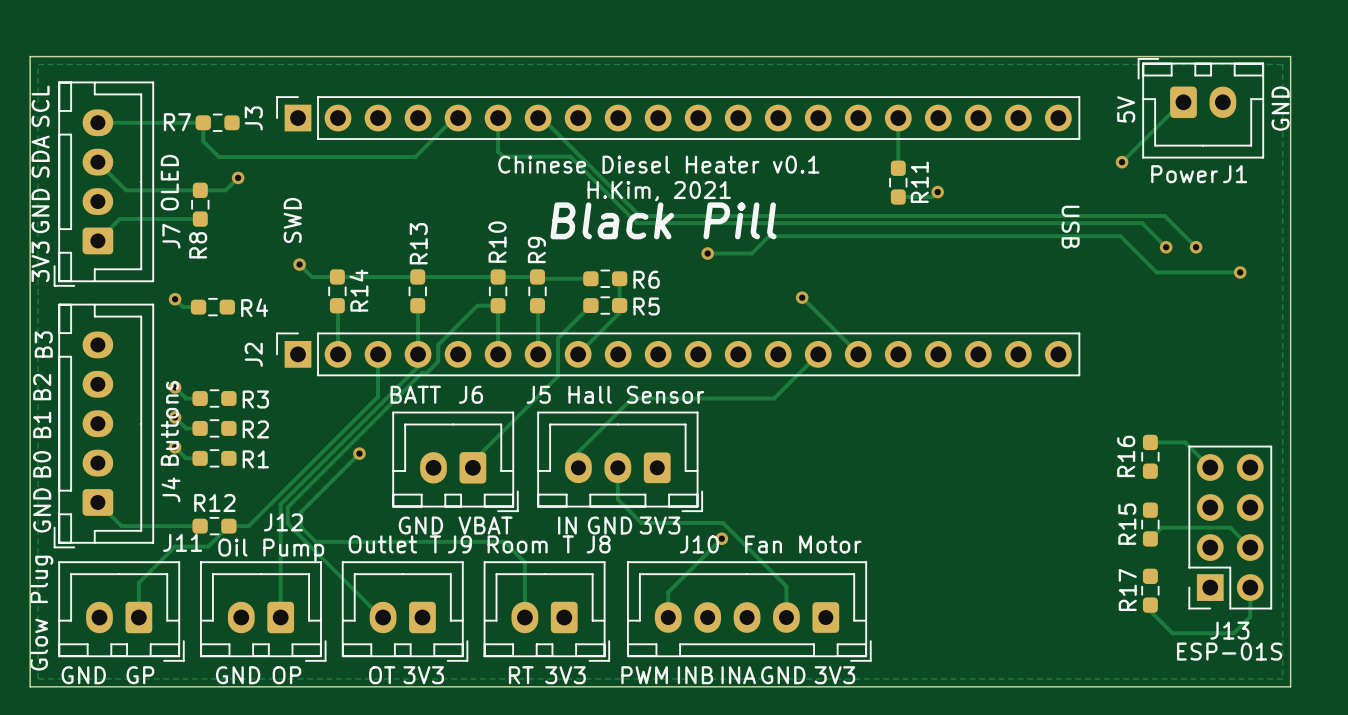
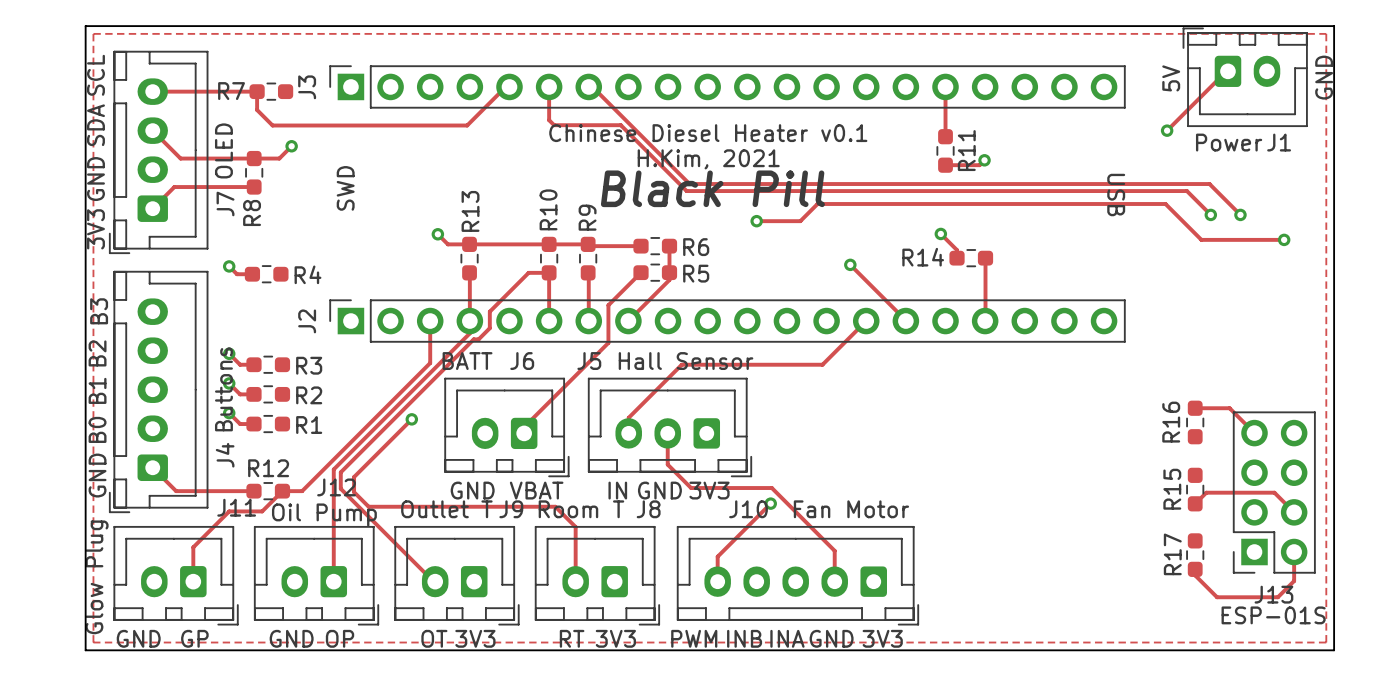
track: (299, 264) (311, 276) (395, 276) -> (437, 234) (447, 244)
via position: (299, 264) -> (437, 234)
track: none -> (940, 233) (957, 250) (957, 258)
via: none -> (940, 233)
R14 name position: R14 (358, 290) -> R14 (923, 257)
track: none -> (985, 258) (985, 321)
R14 rotation: 0° (337, 291) -> 90° clockwise (971, 258)
R14 position: (337, 291) -> (971, 258)
track: (337, 305) (338, 354) -> none

